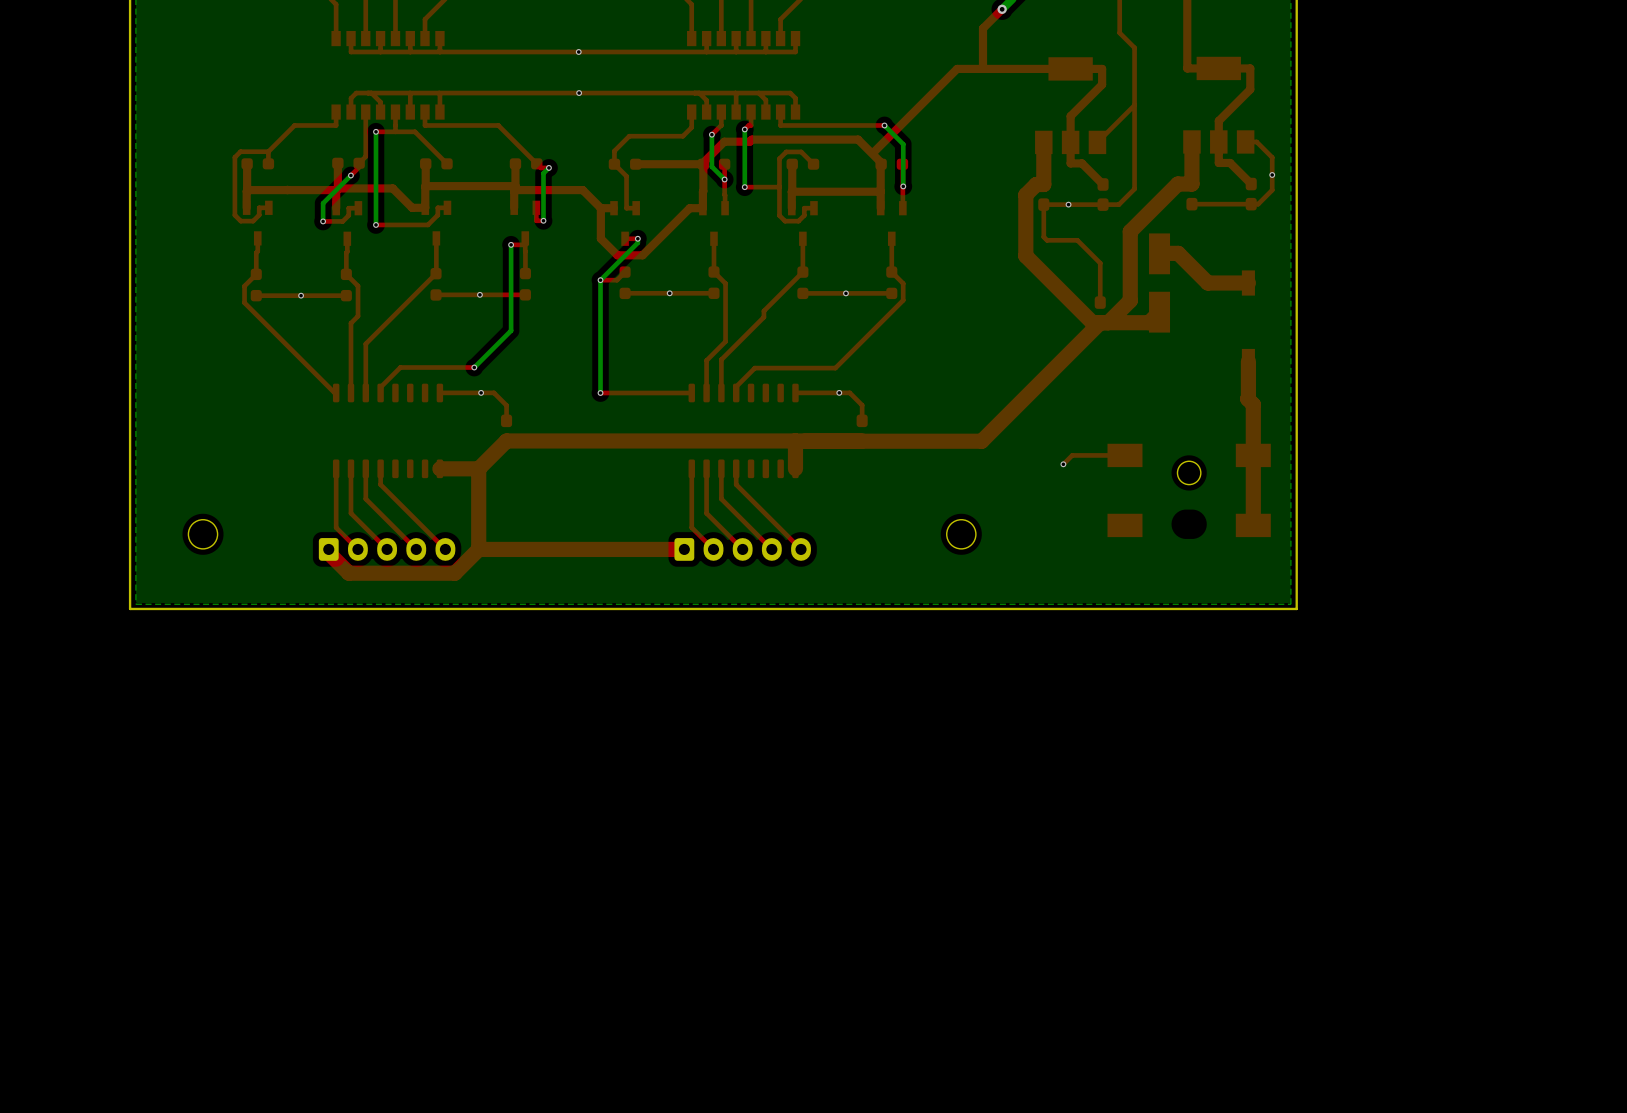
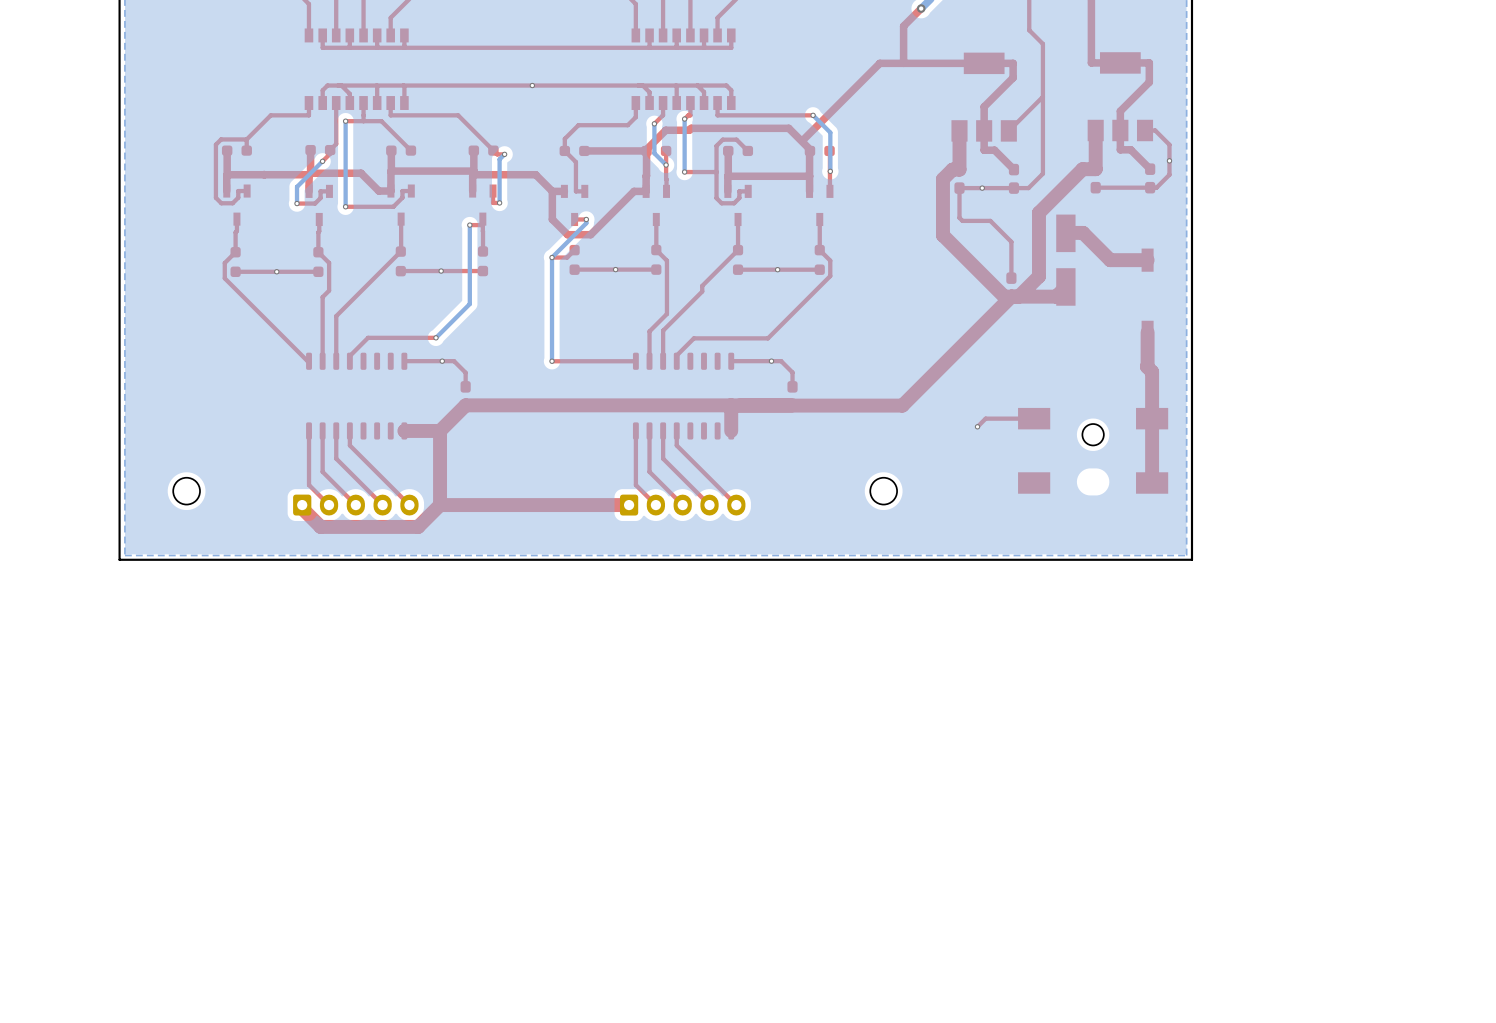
via: (578, 51) -> none

